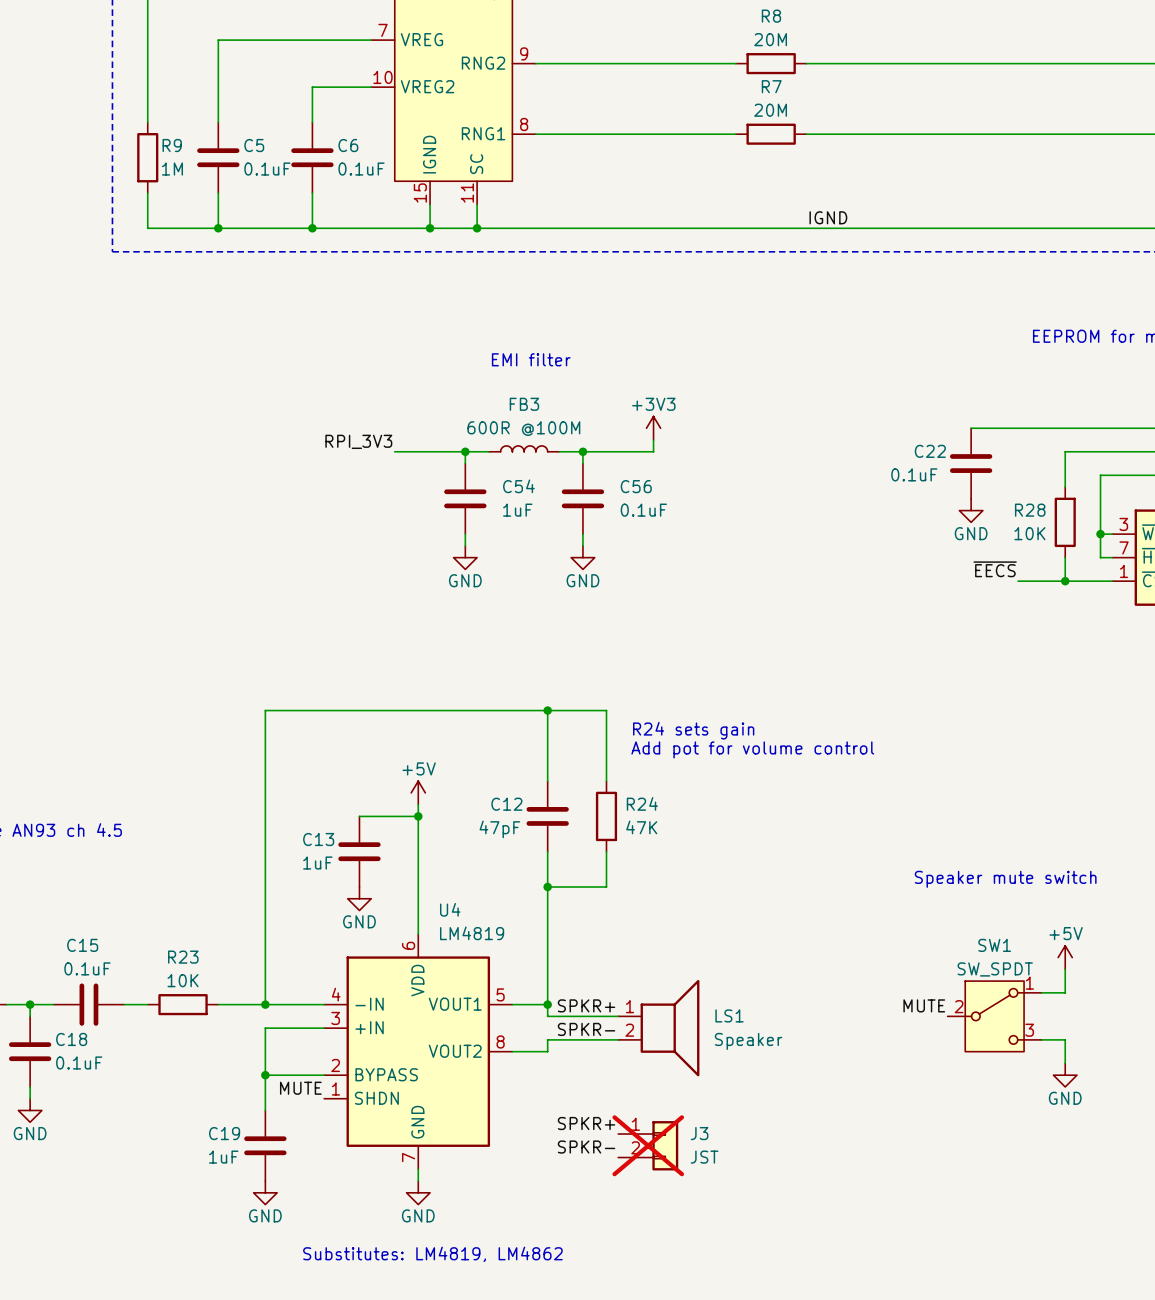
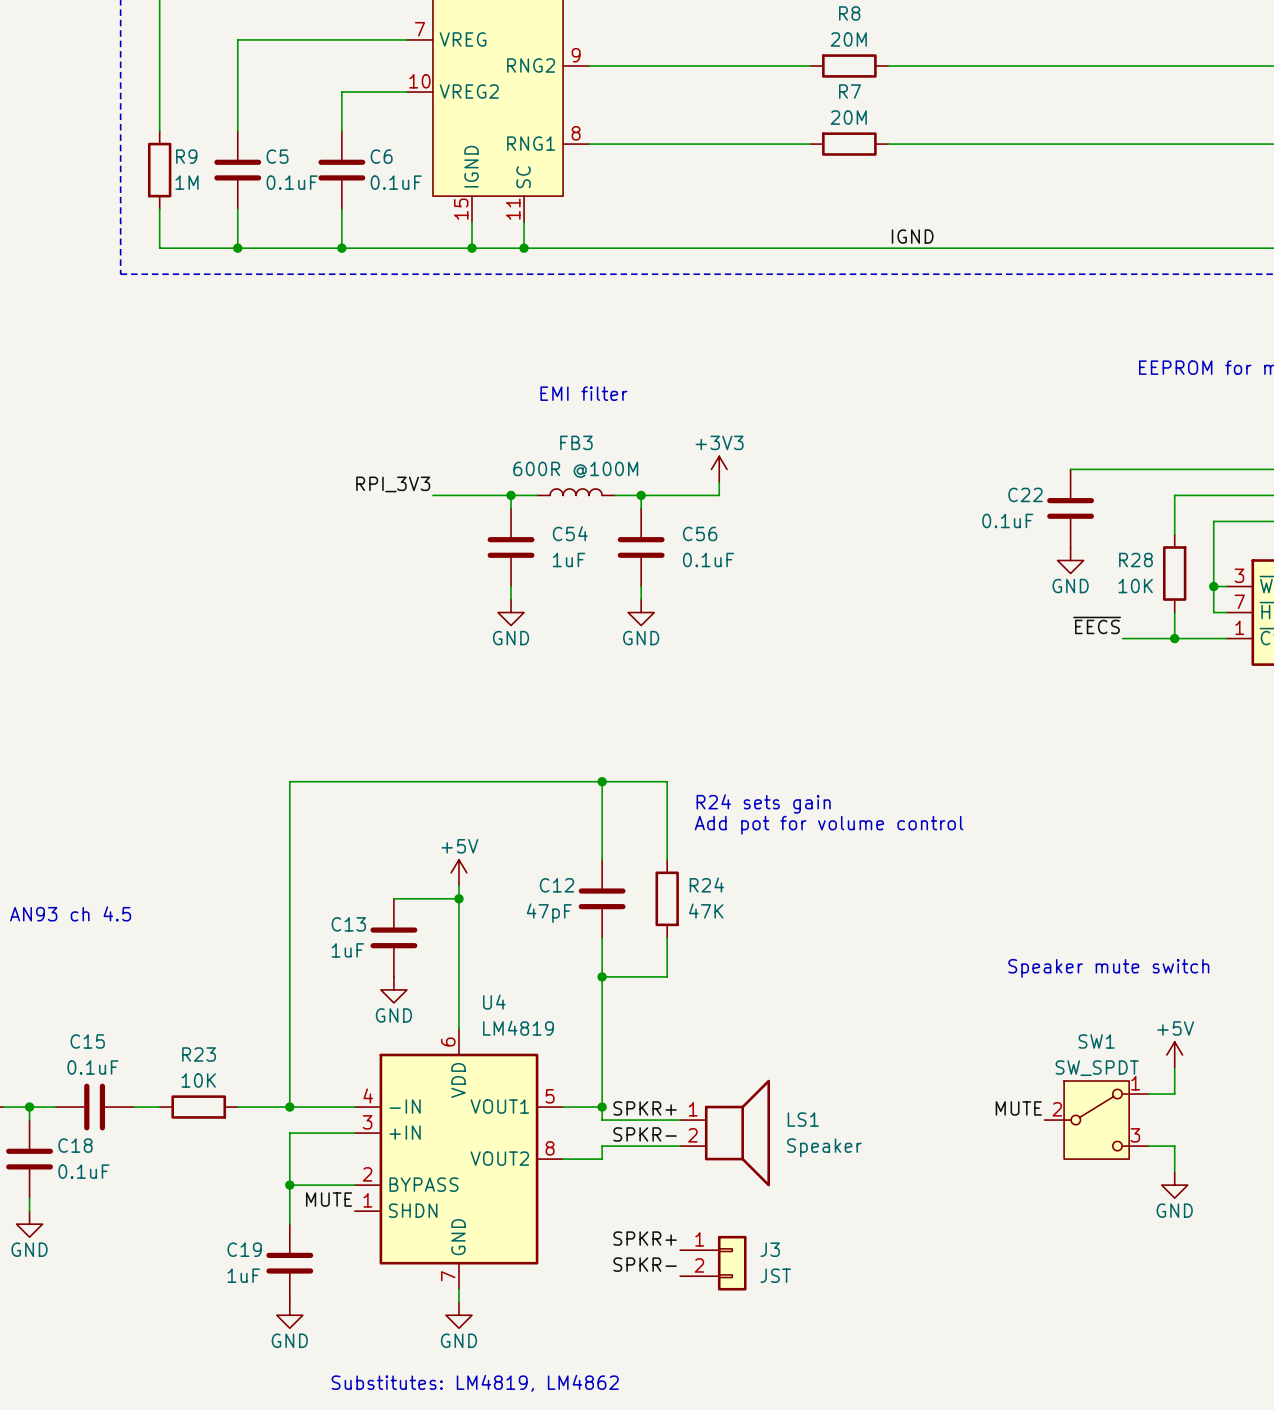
J3 do-not-place cross: (648, 1145) -> none

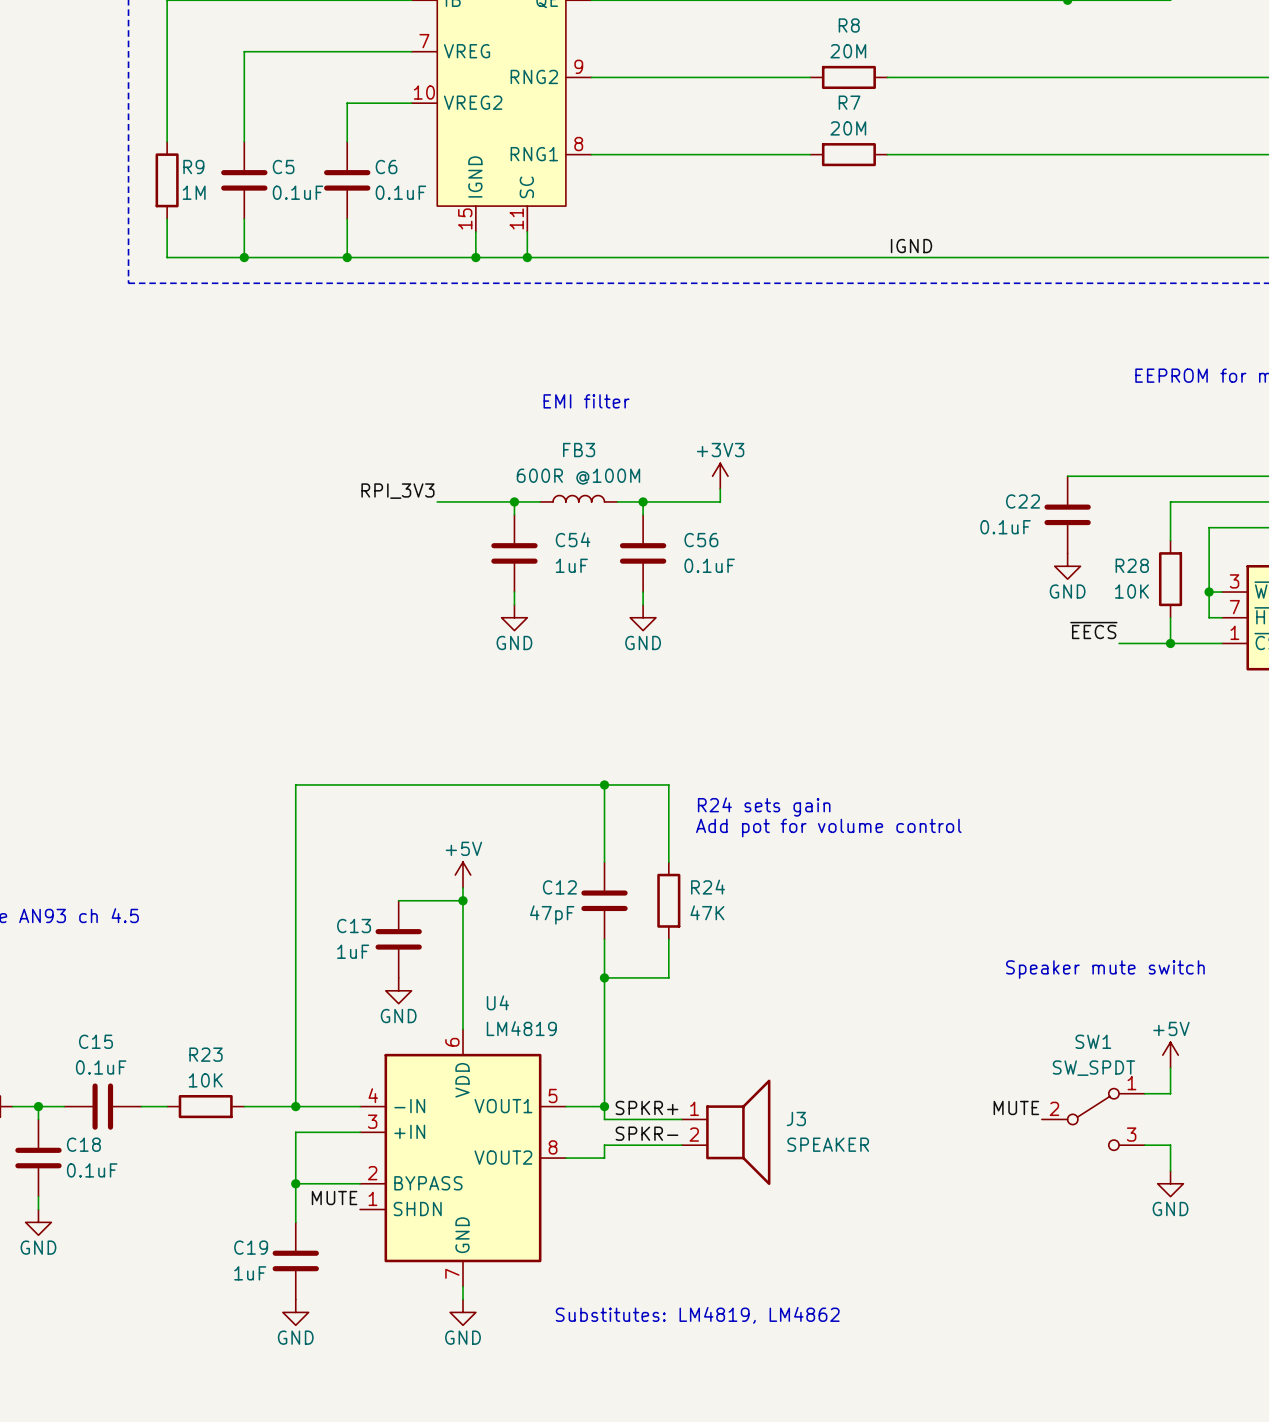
SW1 symbol: [1044, 1081, 1149, 1160] -> [1041, 1088, 1145, 1151]
LS1 name: LS1 (803, 1119) -> J3 (796, 1118)
LS1 value: Speaker (824, 1147) -> SPEAKER (828, 1144)
label: SPKR+ (645, 1238) -> none
J3: JST (713, 1263) -> none
label: SPKR- (645, 1264) -> none
text position: Substitutes: LM4819, LM4862 (475, 1383) -> Substitutes: LM4819, LM4862 (697, 1315)

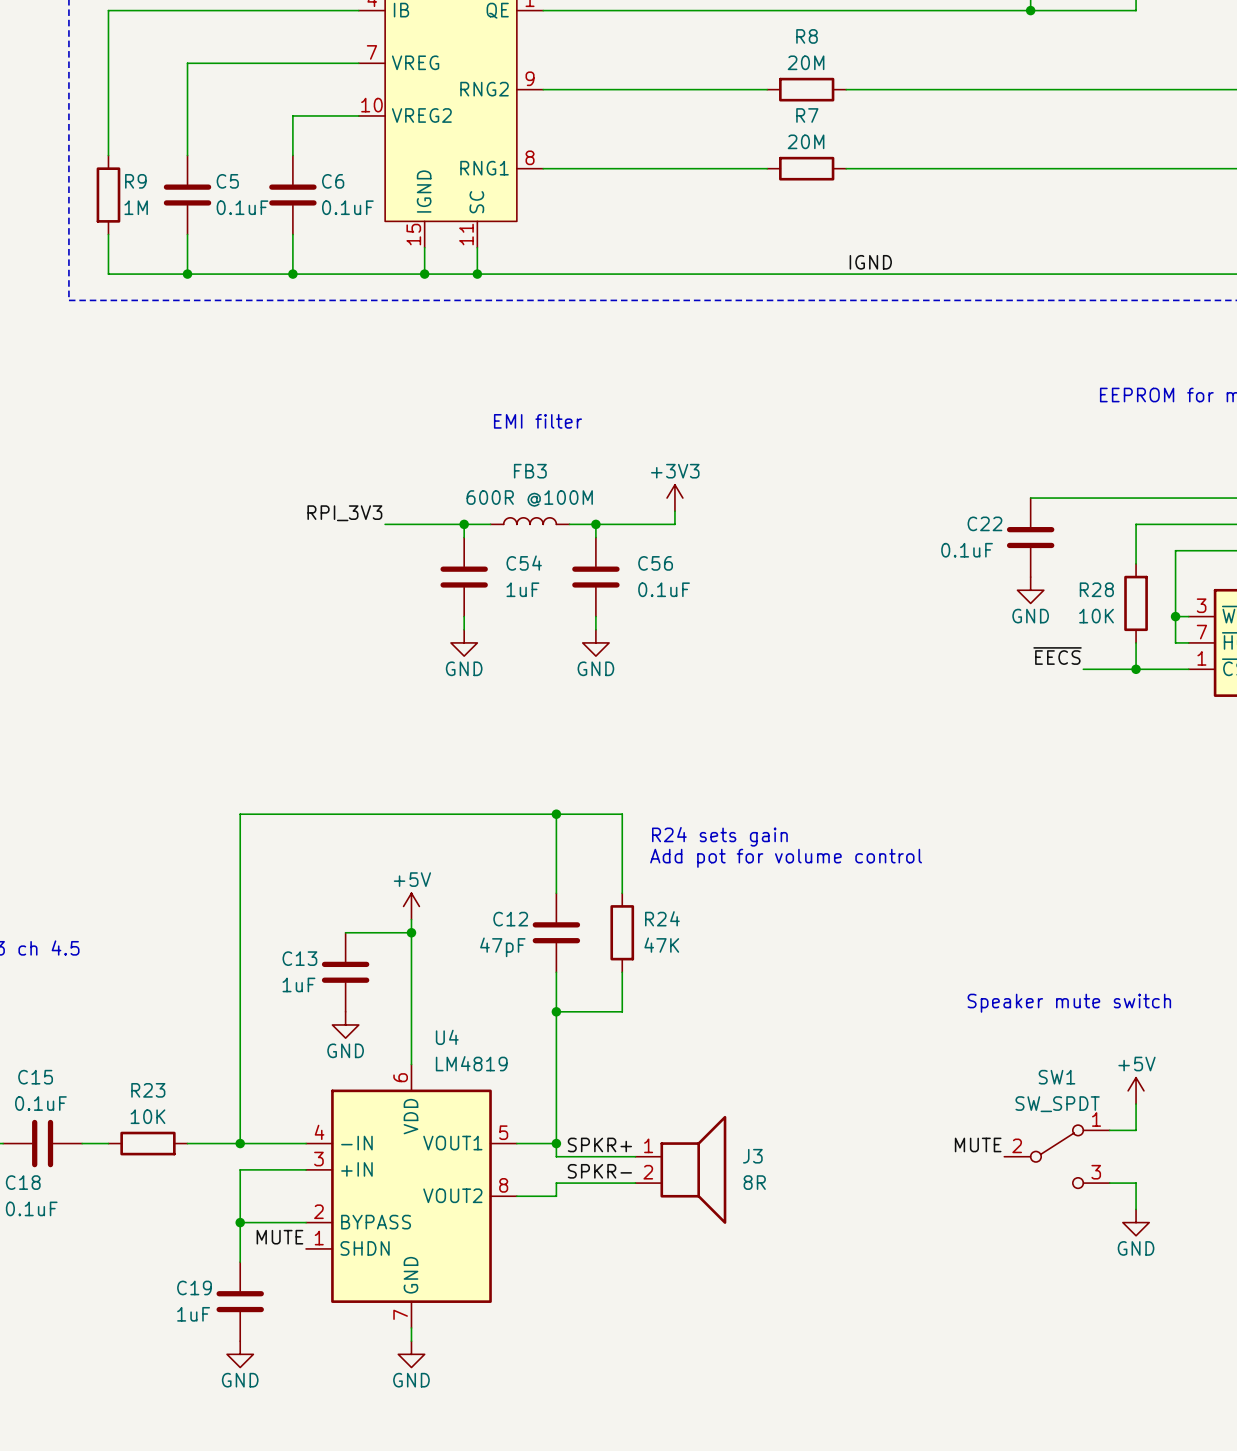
J3 value: SPEAKER (828, 1144) -> 8R (754, 1182)
text: Substitutes: LM4819, LM4862 (697, 1315) -> none

